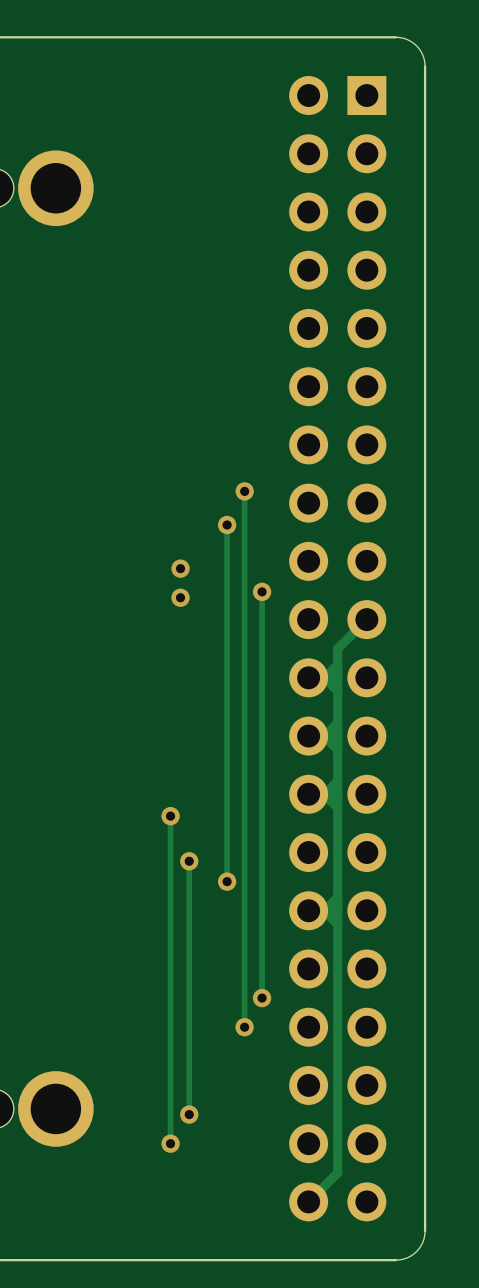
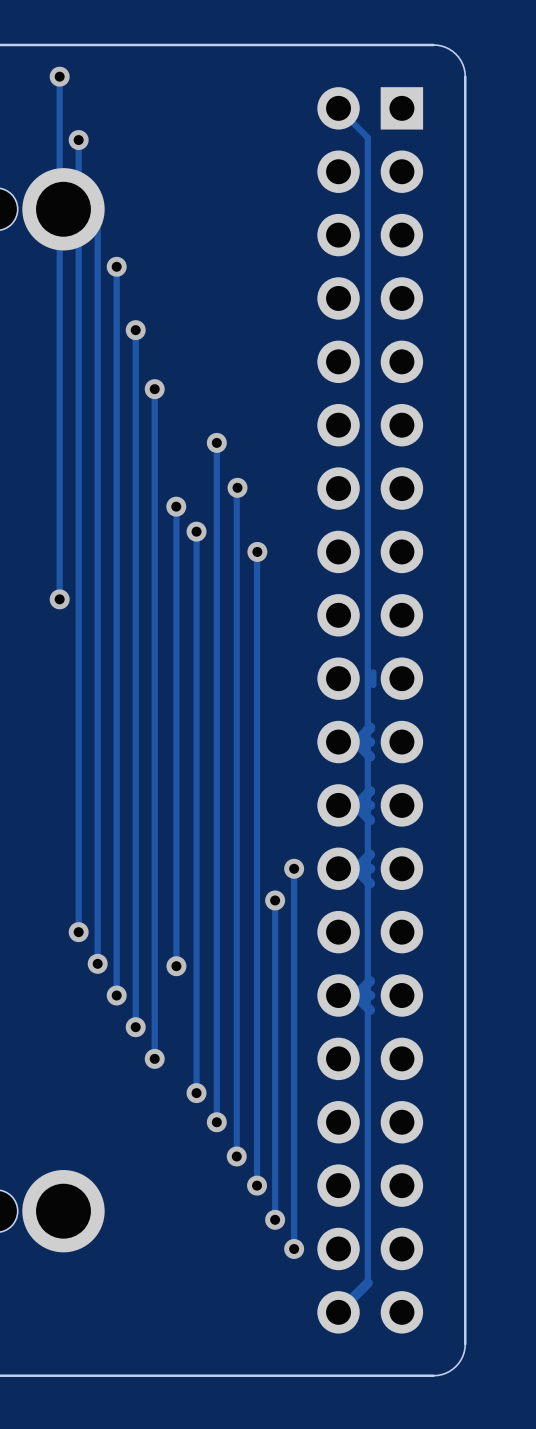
track: none -> (59, 76) (59, 599)
via: none -> (59, 76)
track: none -> (78, 140) (78, 929)
via: none -> (78, 140)
track: none -> (97, 203) (97, 959)
track: none -> (116, 267) (116, 989)
via: none -> (116, 266)
via: none -> (135, 330)
track: none -> (135, 337) (135, 1027)
track: none -> (154, 389) (154, 1058) (151, 1058)
via: none -> (154, 389)
track: none -> (216, 437) (216, 1122)
via: none -> (216, 442)
via: none -> (237, 487)
track: none -> (236, 488) (236, 1156)
track: none -> (176, 506) (176, 966)
via: none -> (176, 506)
track: none -> (196, 529) (196, 1093)
via: none -> (196, 531)
track: (244, 491) (244, 1027) -> none
via position: (244, 491) -> (257, 551)
track: none -> (257, 552) (257, 1185)
track: (227, 524) (227, 881) -> none
via: (227, 524) -> none
via: none -> (59, 599)
via: (180, 568) -> none
track: (262, 591) (262, 998) -> none
via: (262, 591) -> none
via: (180, 597) -> none
track: none -> (373, 672) (373, 685)
track: (366, 619) (337, 648) (337, 1172) (335, 1174) -> (338, 108) (367, 137) (367, 1283)
track: none -> (294, 868) (294, 1248)
via: none -> (294, 868)
via: (170, 816) -> none
track: (170, 820) (170, 1143) -> none
track: none -> (275, 900) (275, 1219)
via: none -> (275, 900)
via: none -> (78, 932)
track: (189, 858) (189, 1114) -> none
via: (189, 861) -> none
via: none -> (97, 963)
via: (227, 881) -> none
via: none -> (176, 966)
via: none -> (116, 995)
via: none -> (135, 1027)
via: none -> (154, 1058)
via: (262, 998) -> none
via: none -> (196, 1093)
via: none -> (216, 1122)
via: (244, 1027) -> none
via: none -> (236, 1156)
via: none -> (257, 1185)
via: (189, 1114) -> none
via: none -> (275, 1219)
via: (170, 1143) -> none
via: none -> (294, 1248)

